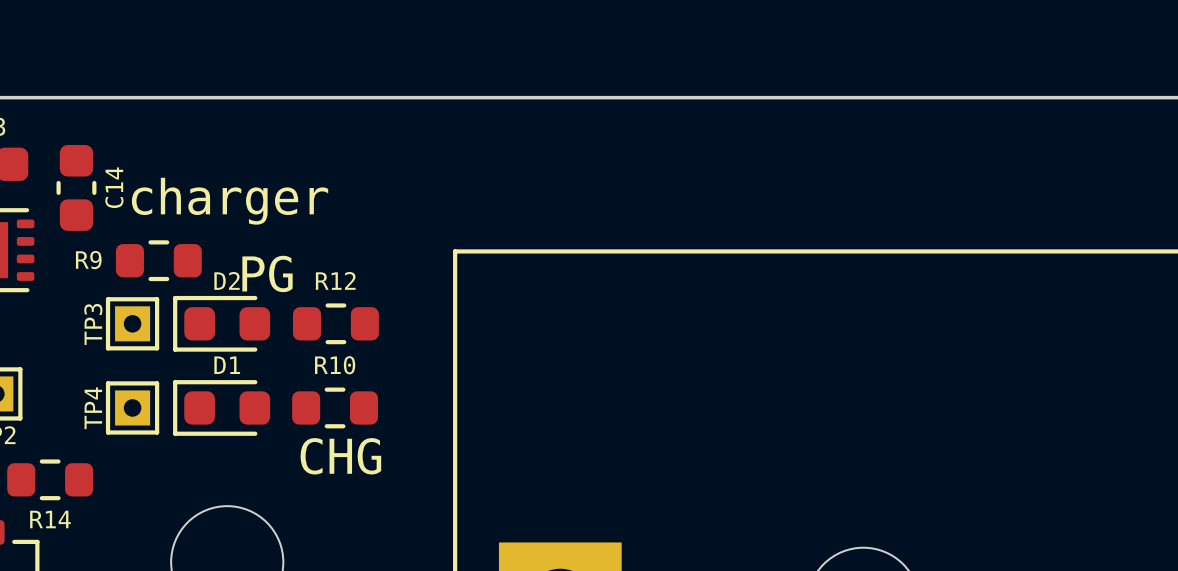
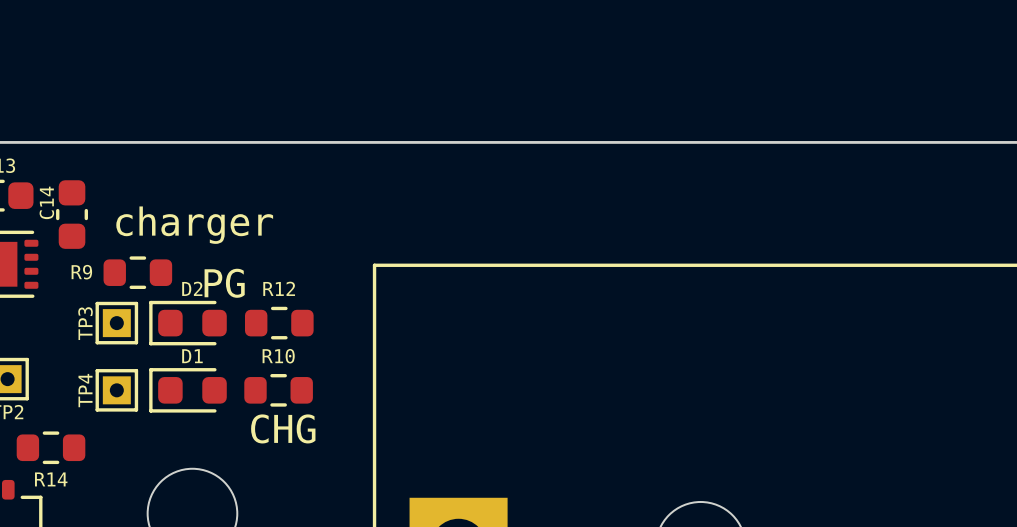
C14 name position: C14 (114, 187) -> C14 (46, 202)

